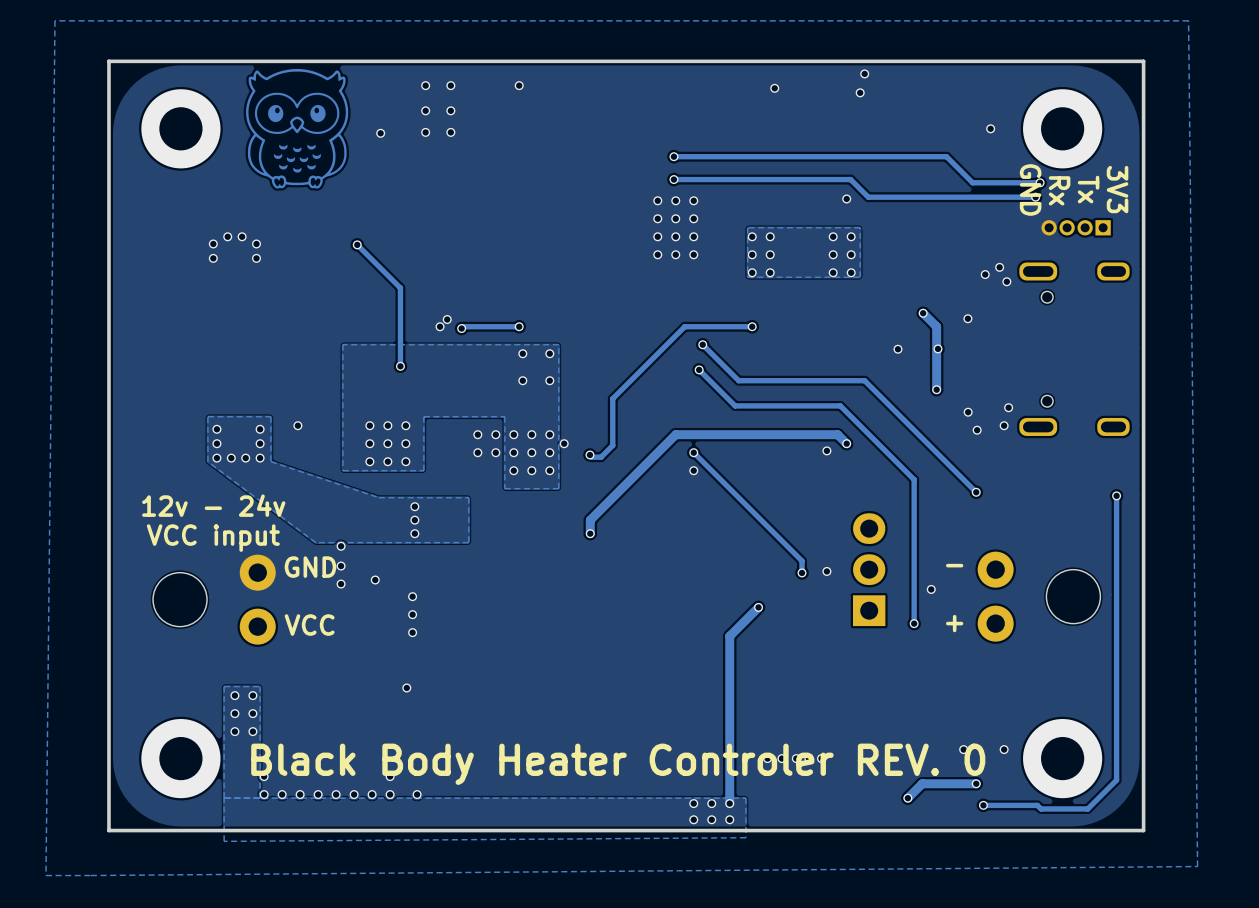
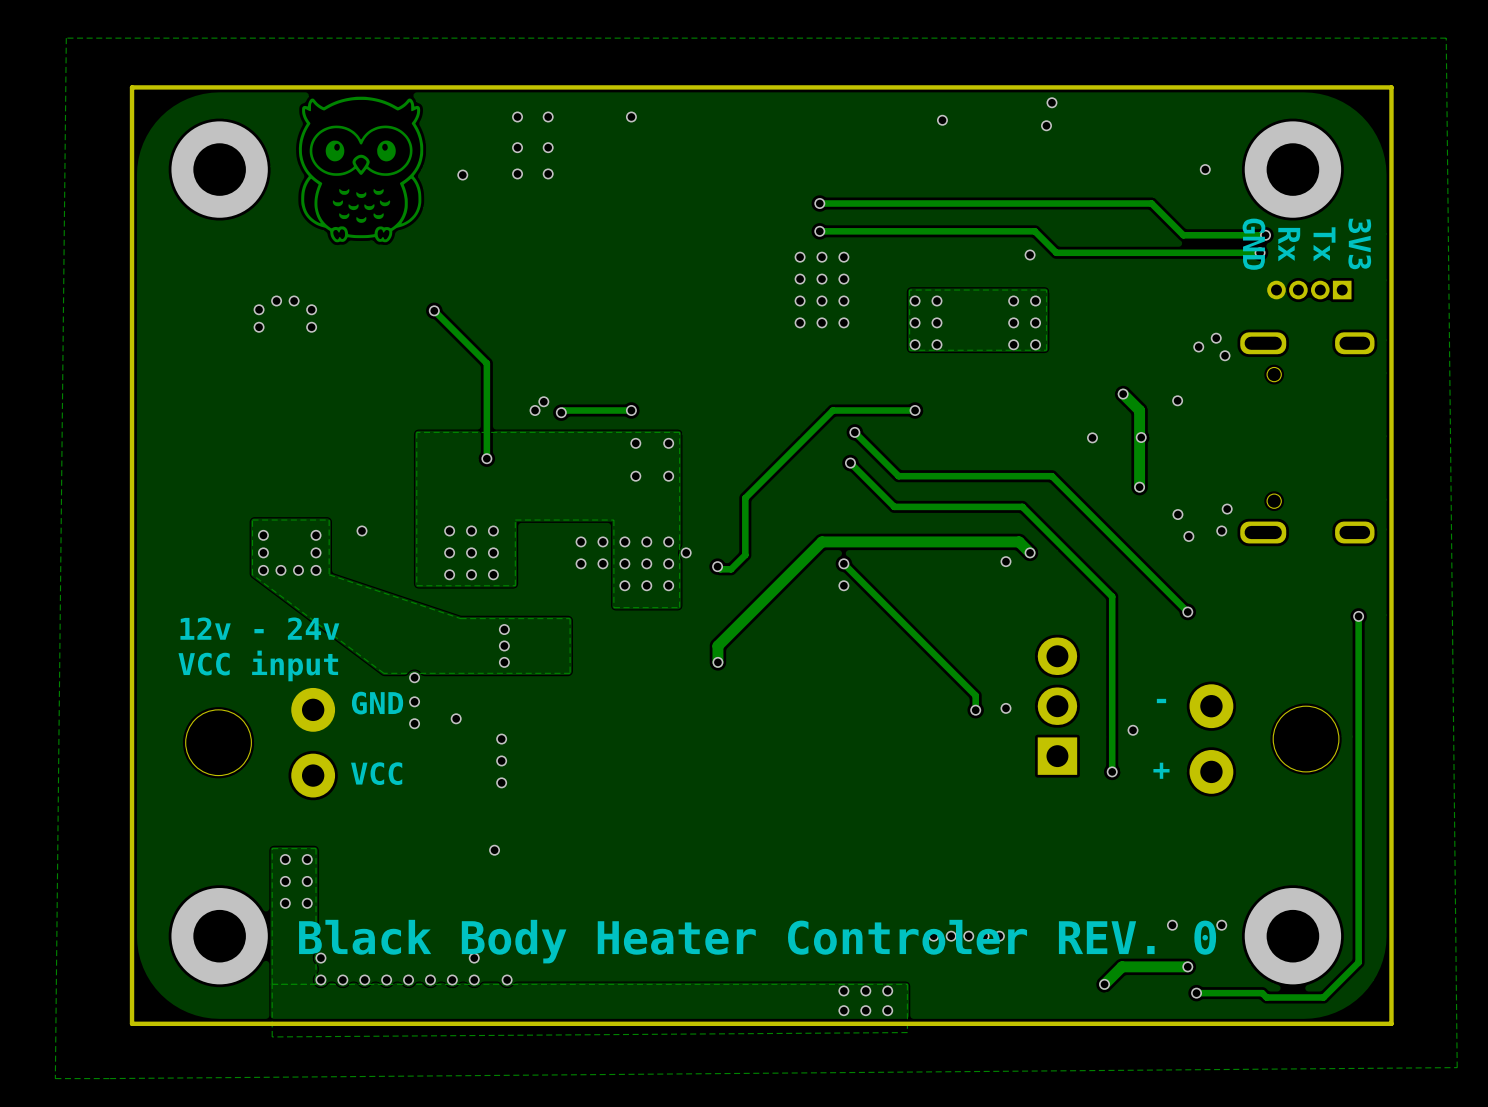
track: (758, 607) (729, 636) (729, 803) -> none
via: (758, 607) -> none

